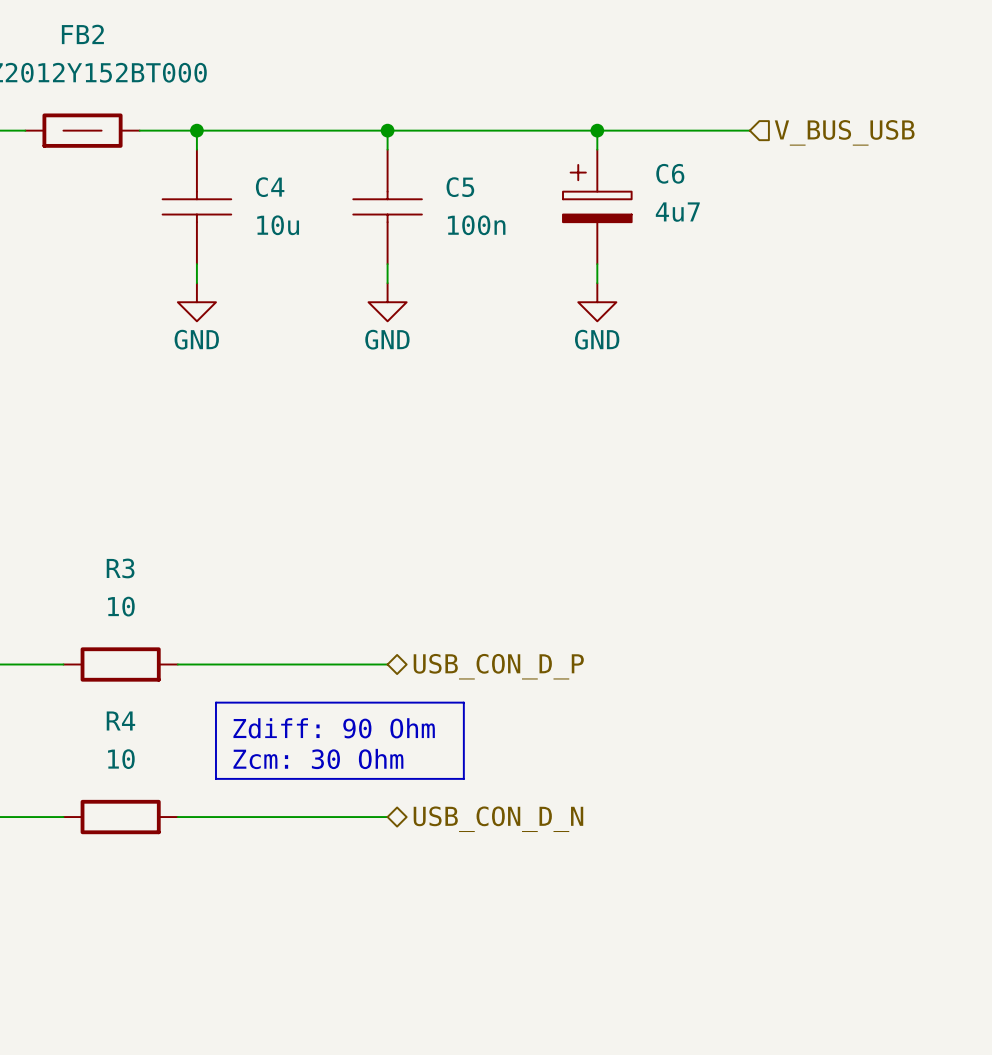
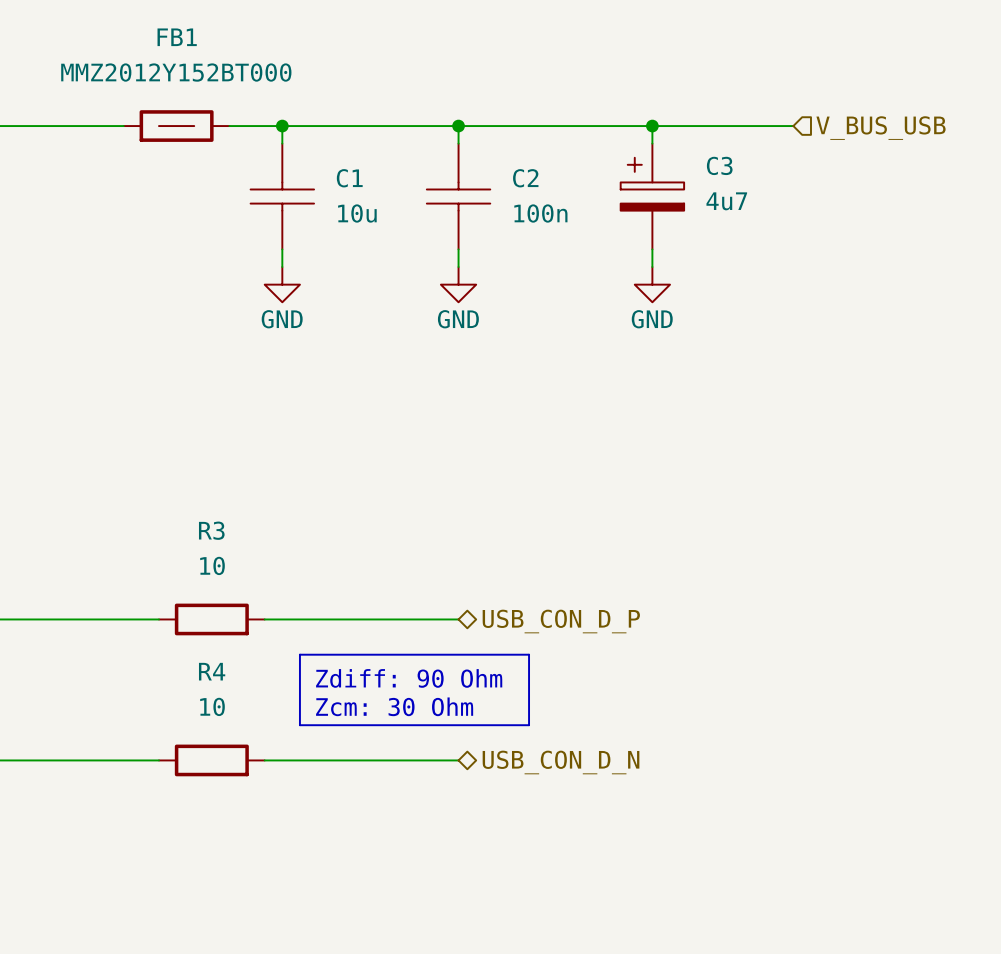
FB2 name: FB2 (82, 34) -> FB1 (177, 37)
C6 name: C6 (670, 173) -> C3 (719, 165)
C4 name: C4 (270, 187) -> C1 (349, 178)
C5 name: C5 (460, 187) -> C2 (525, 178)

